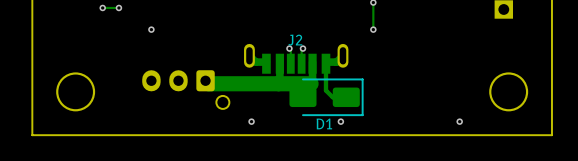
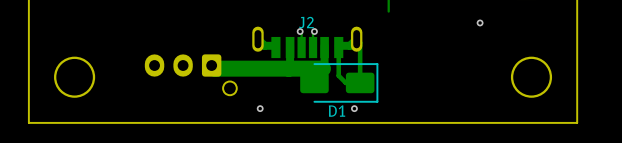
via: (151, 29) -> none
via: (373, 29) -> none
via: none -> (480, 22)
track: none -> (356, 39) (360, 42) (360, 82)
via: (459, 121) -> none

